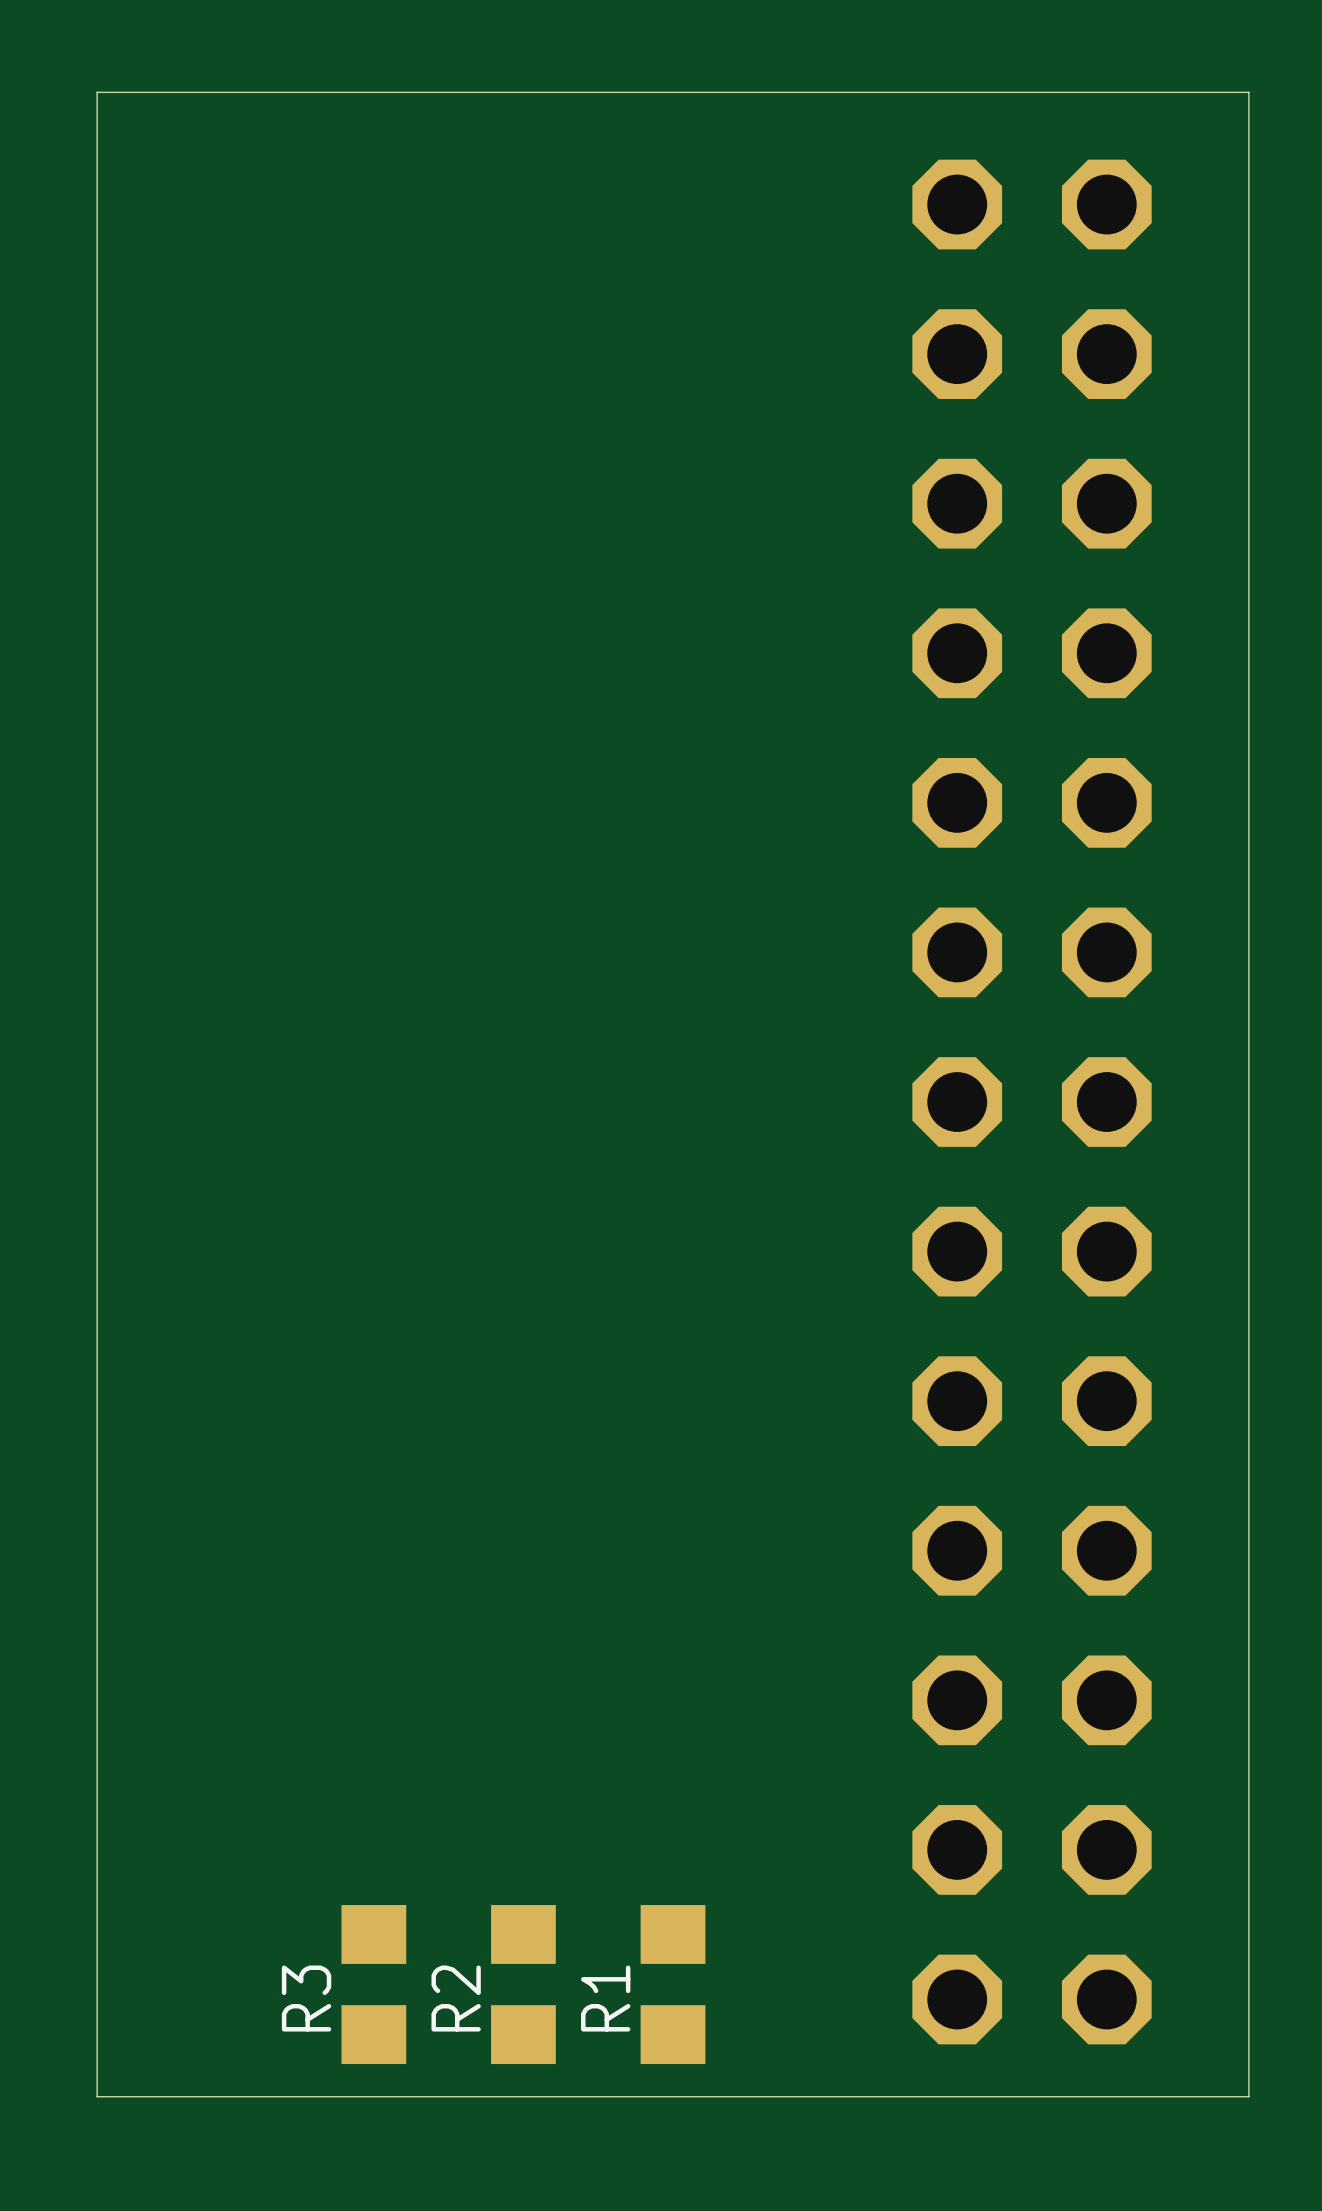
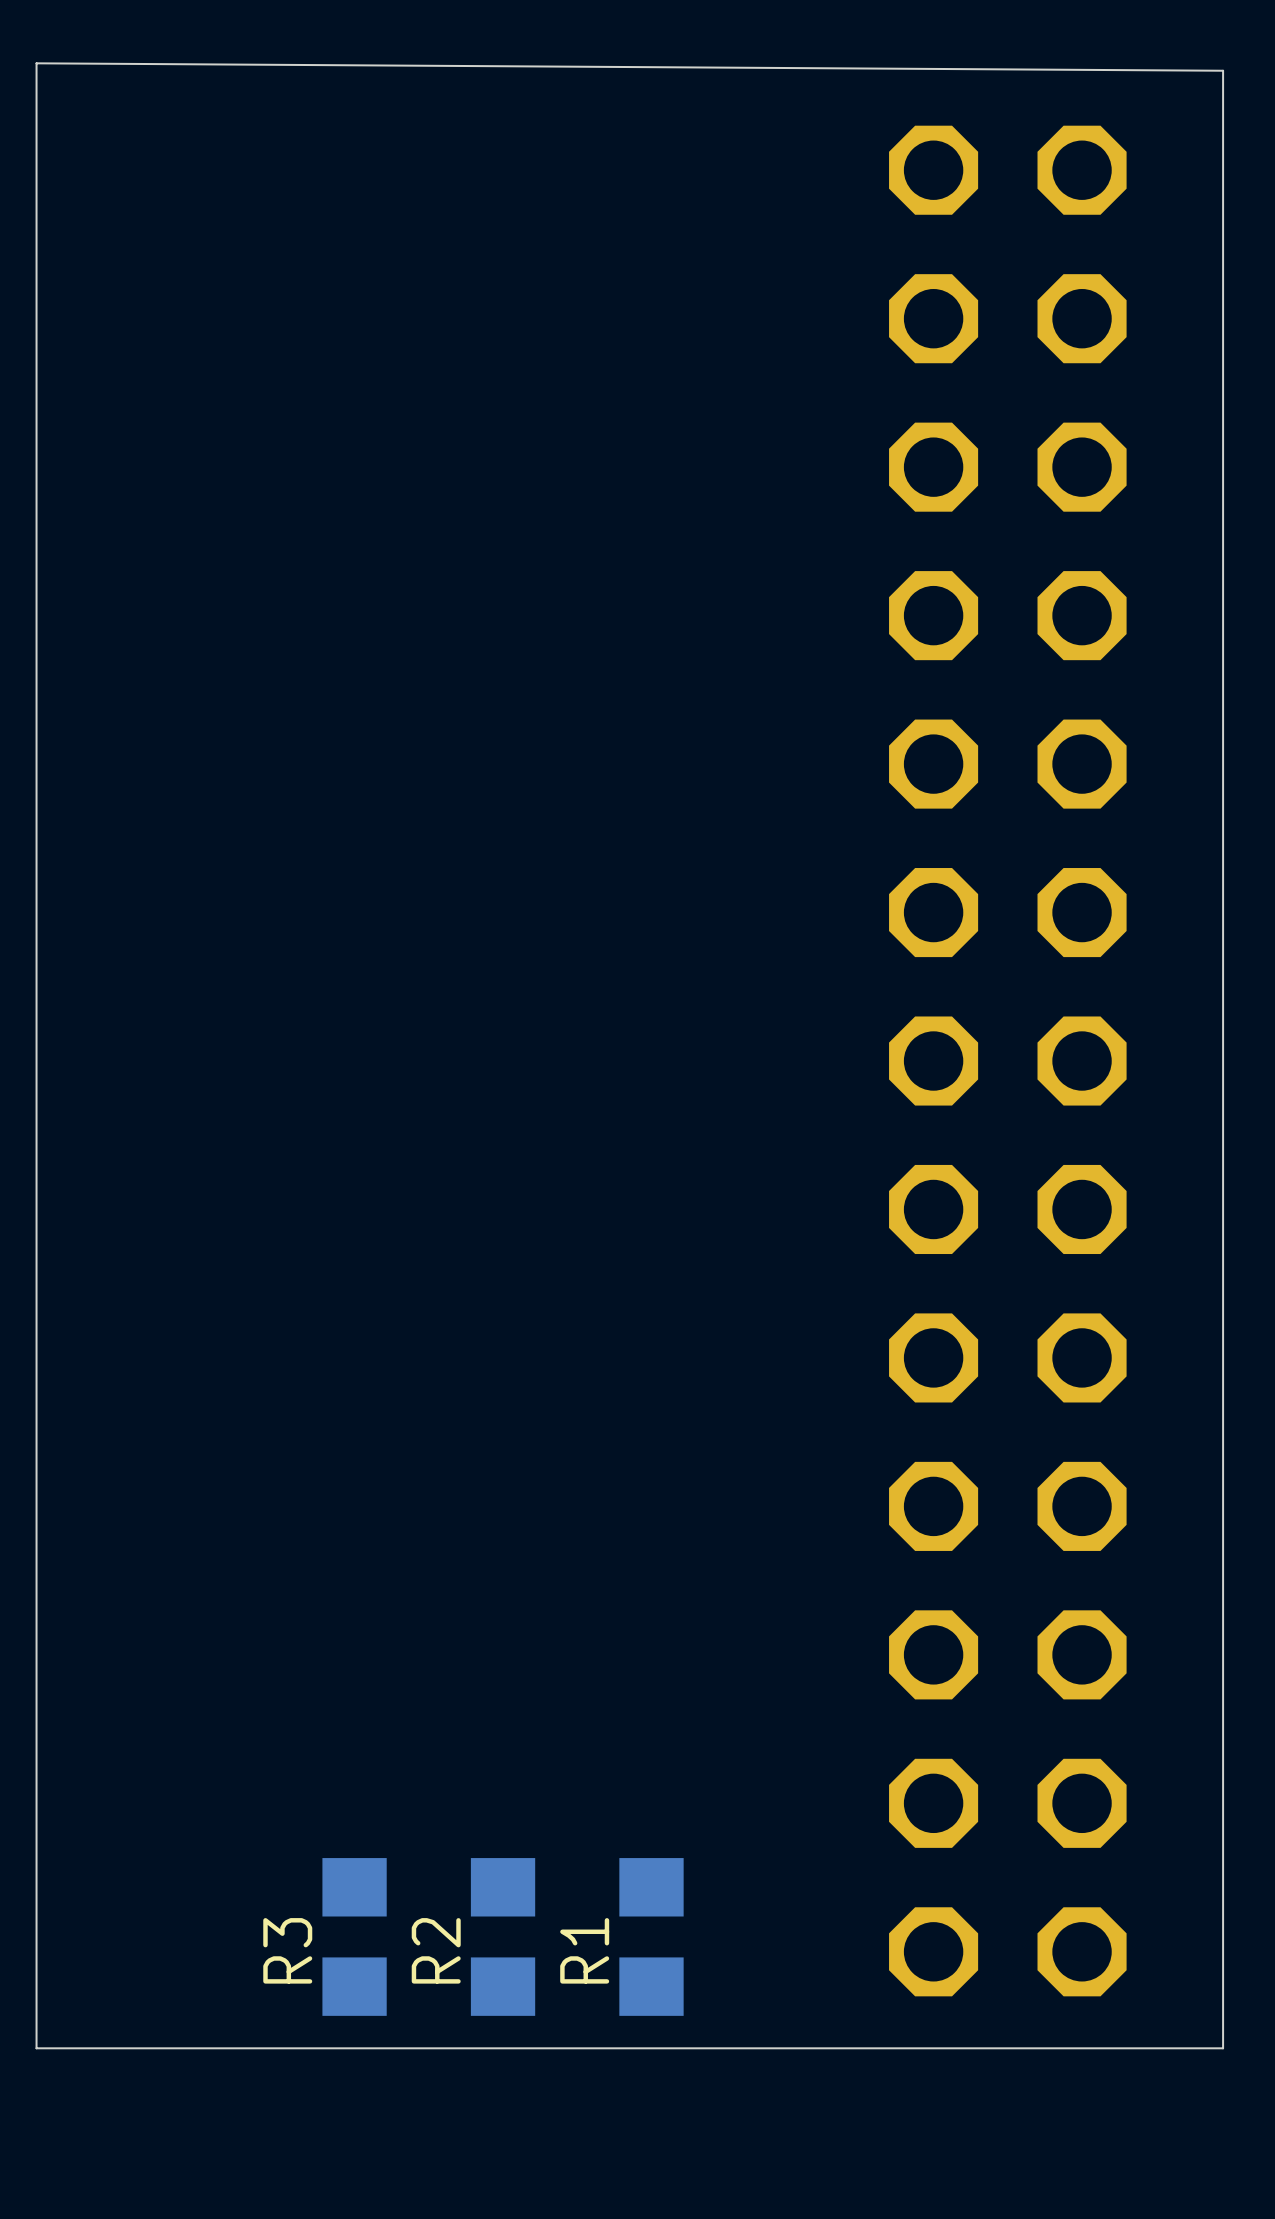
board edge: (1248, 104) (1248, 92) (97, 92) (97, 2096) -> (1223, 70) (36, 63) (36, 2048) (79, 2048)

